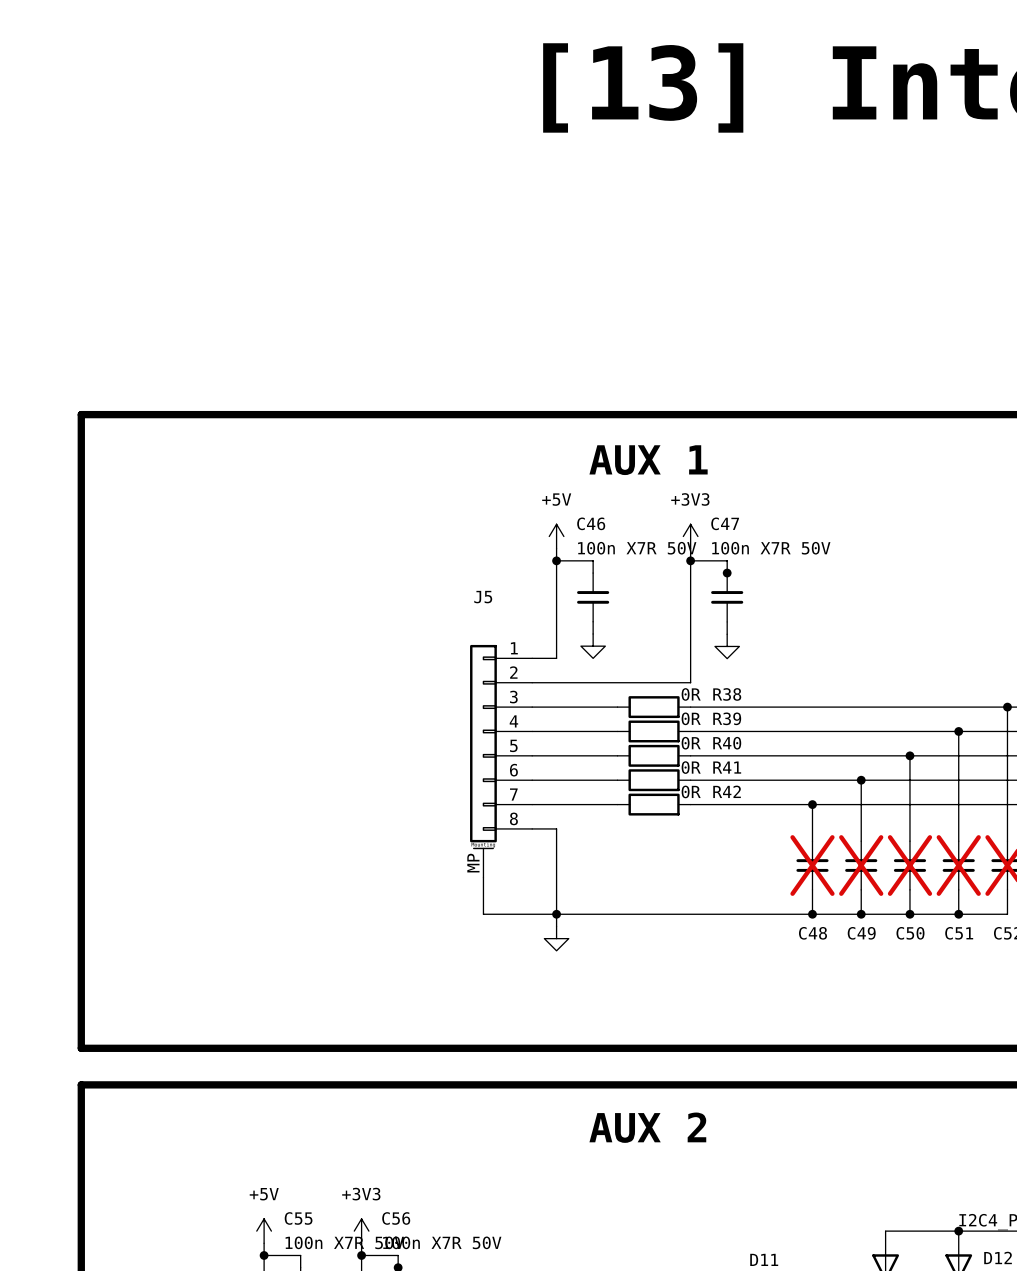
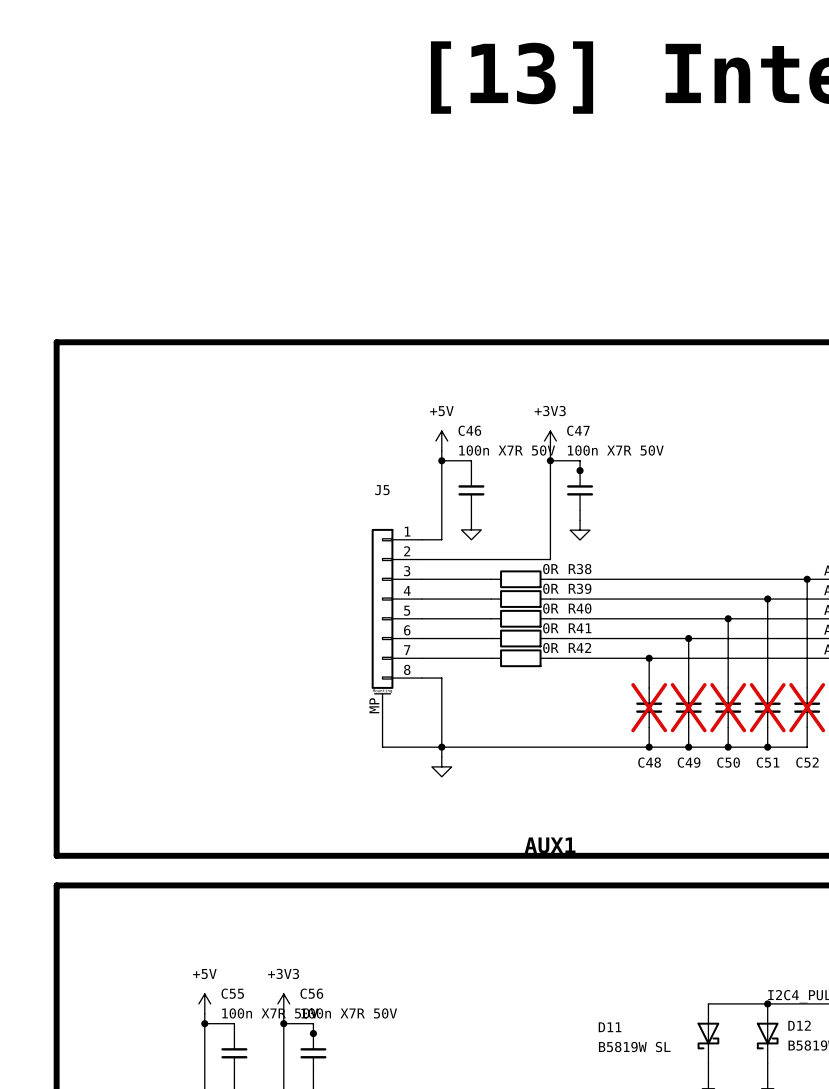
text: AUX 1 (648, 460) -> none
text: none -> AUX1 (550, 845)
text: AUX 2 (647, 1127) -> none

